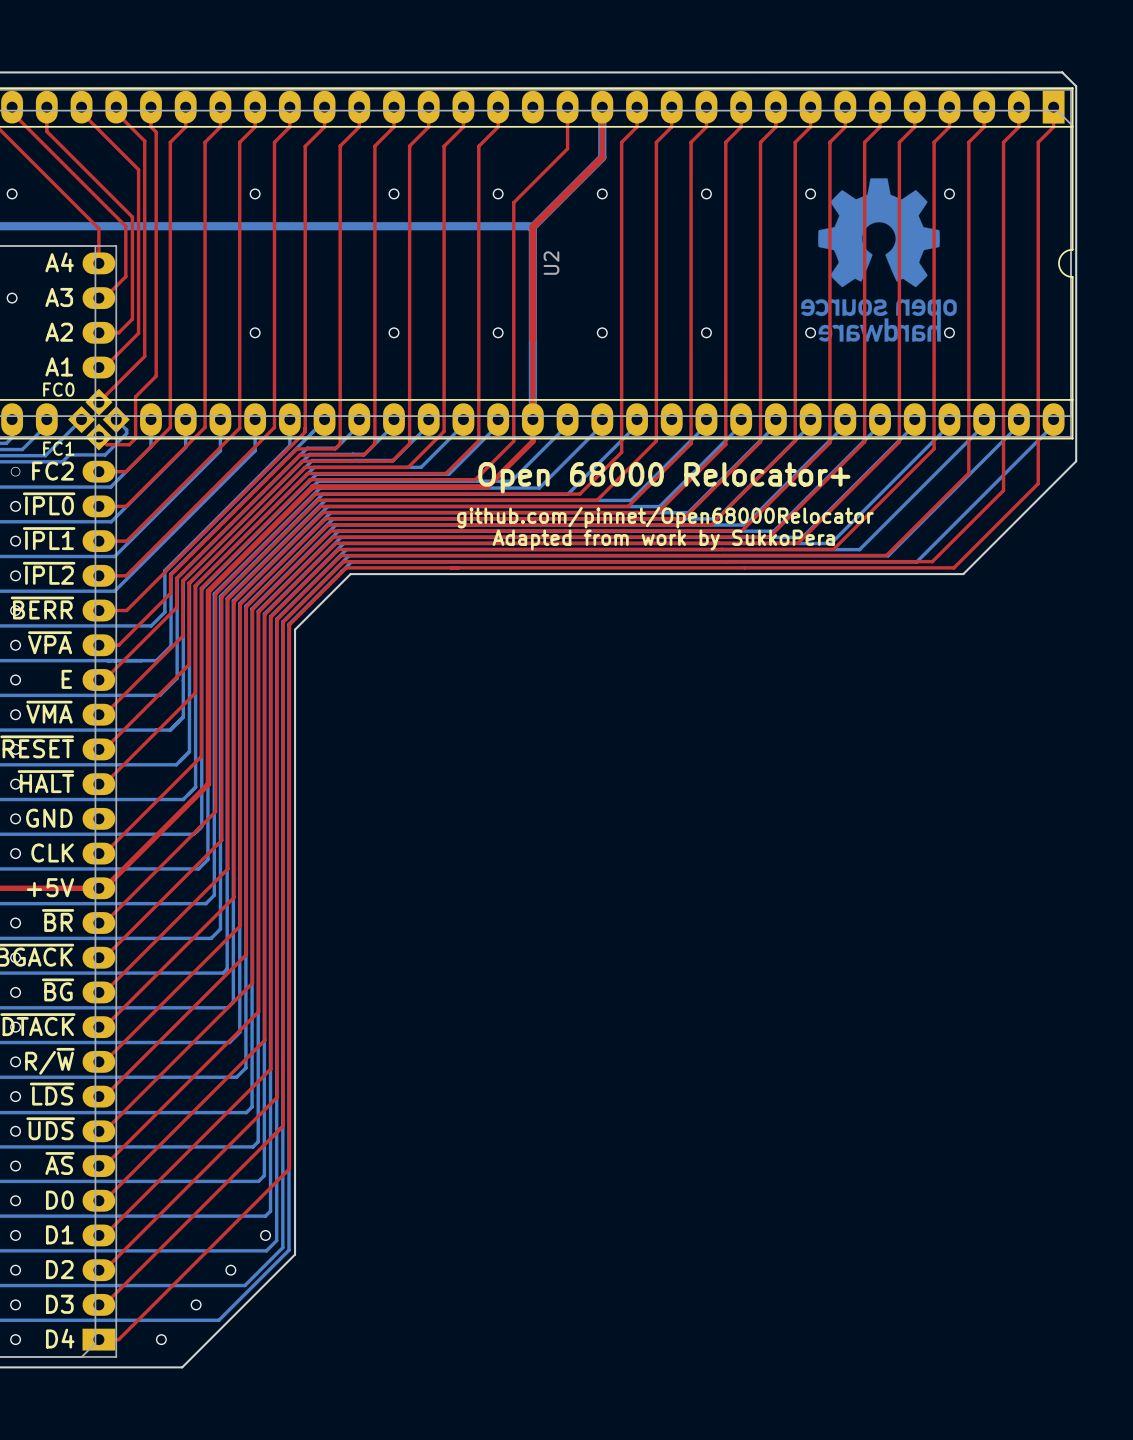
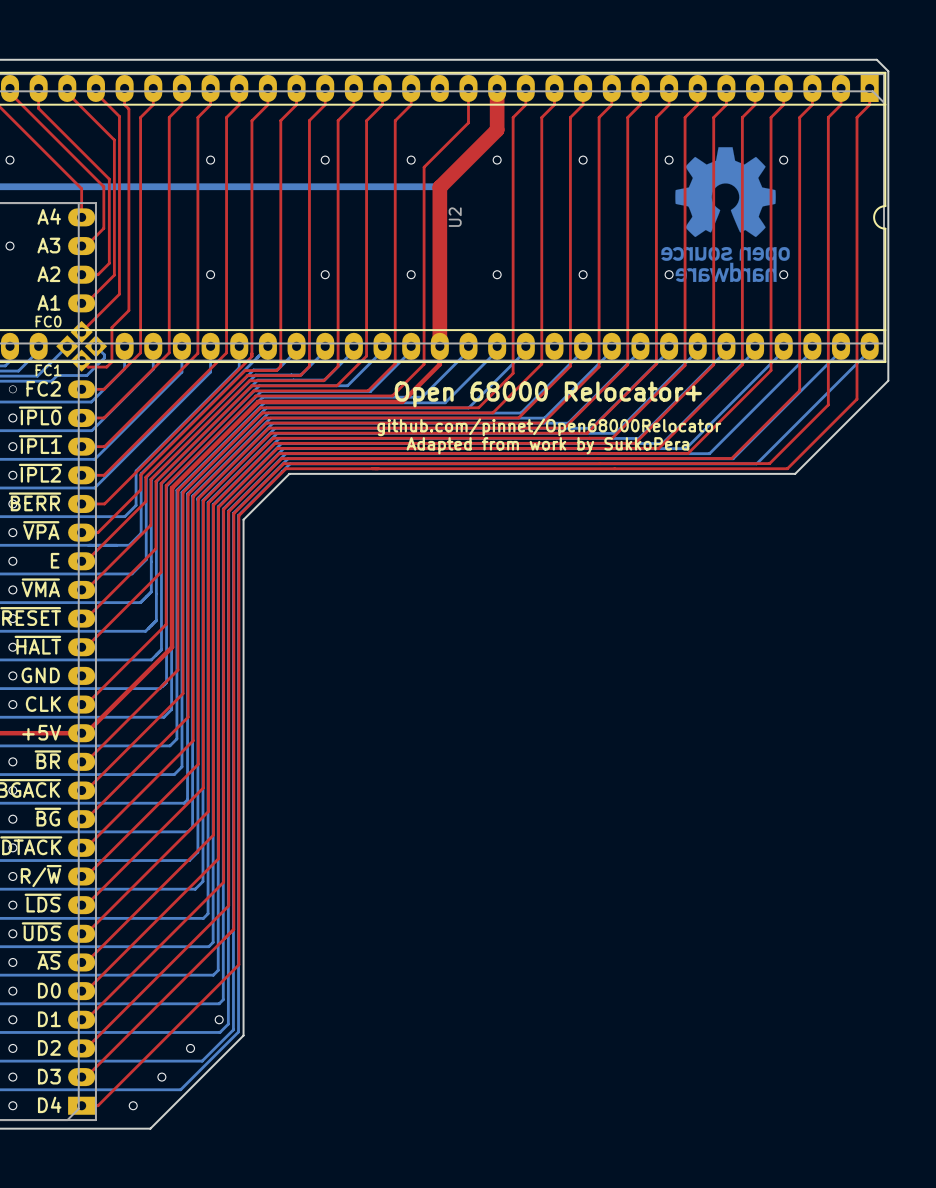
top track width: thin (602, 107) (602, 157) (532, 226) (532, 419) -> thick (497, 88) (497, 129) (439, 187) (439, 346)

